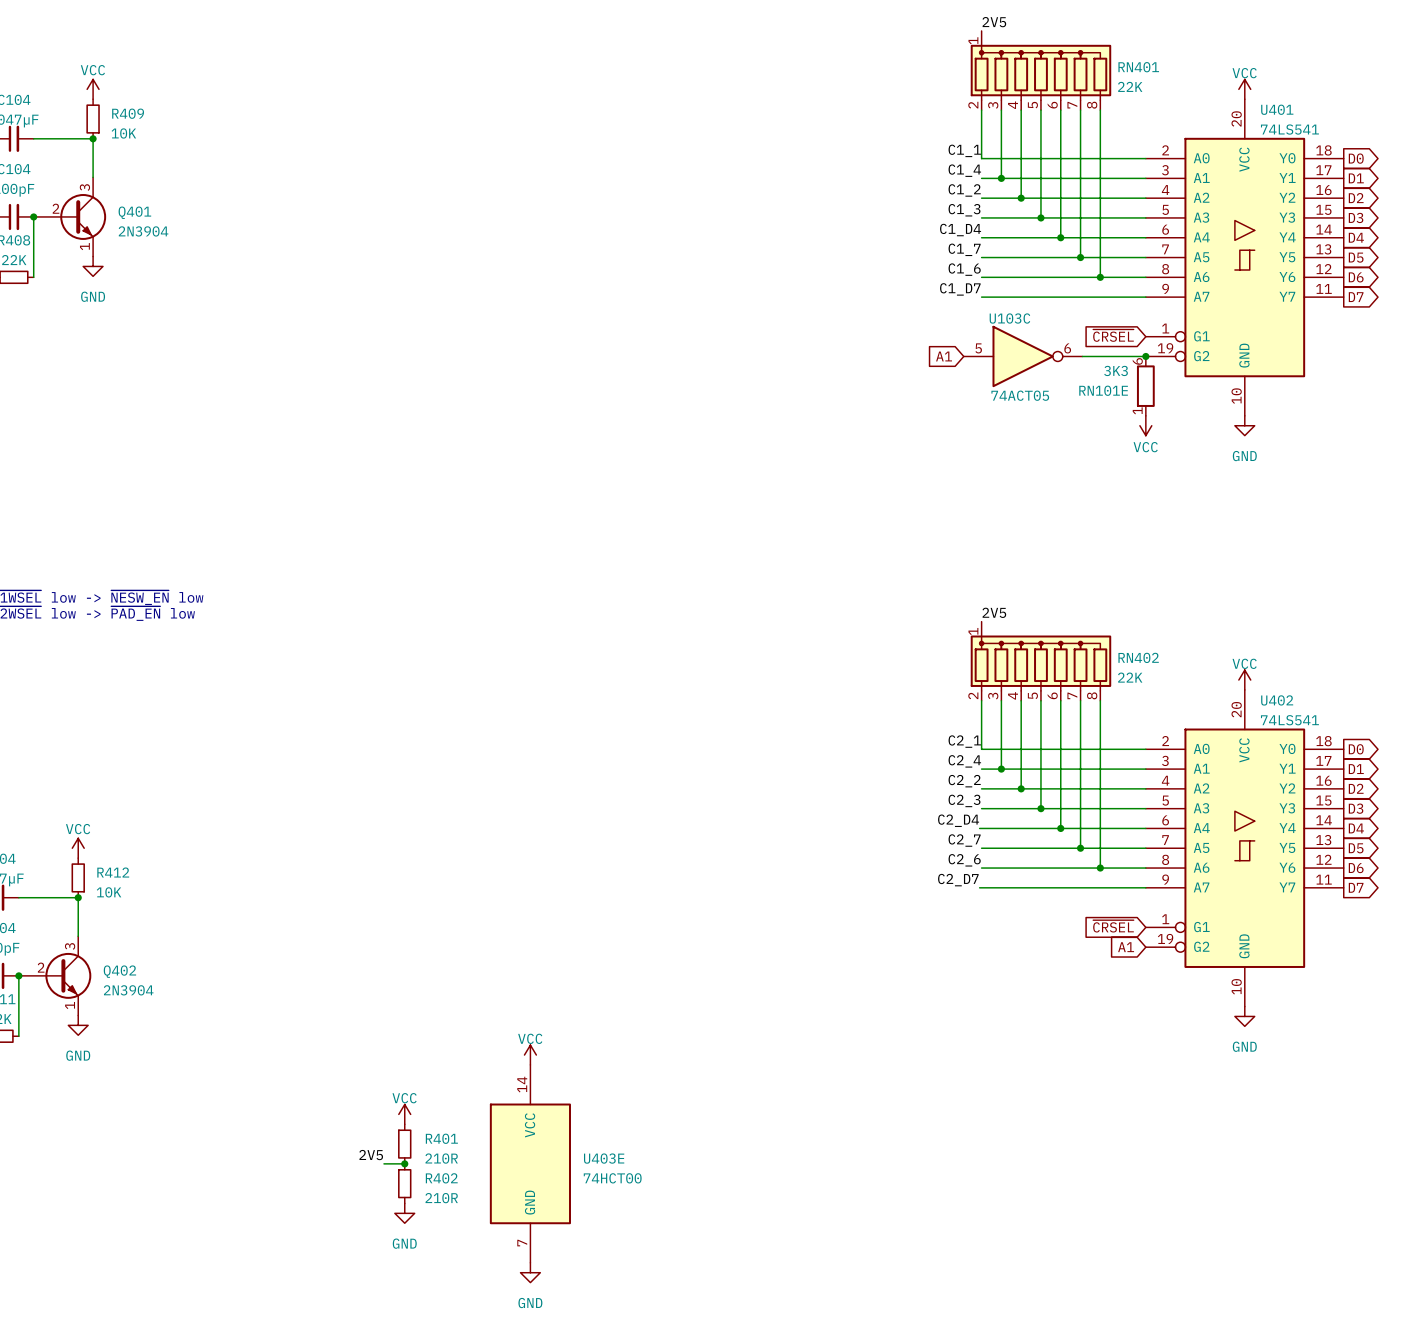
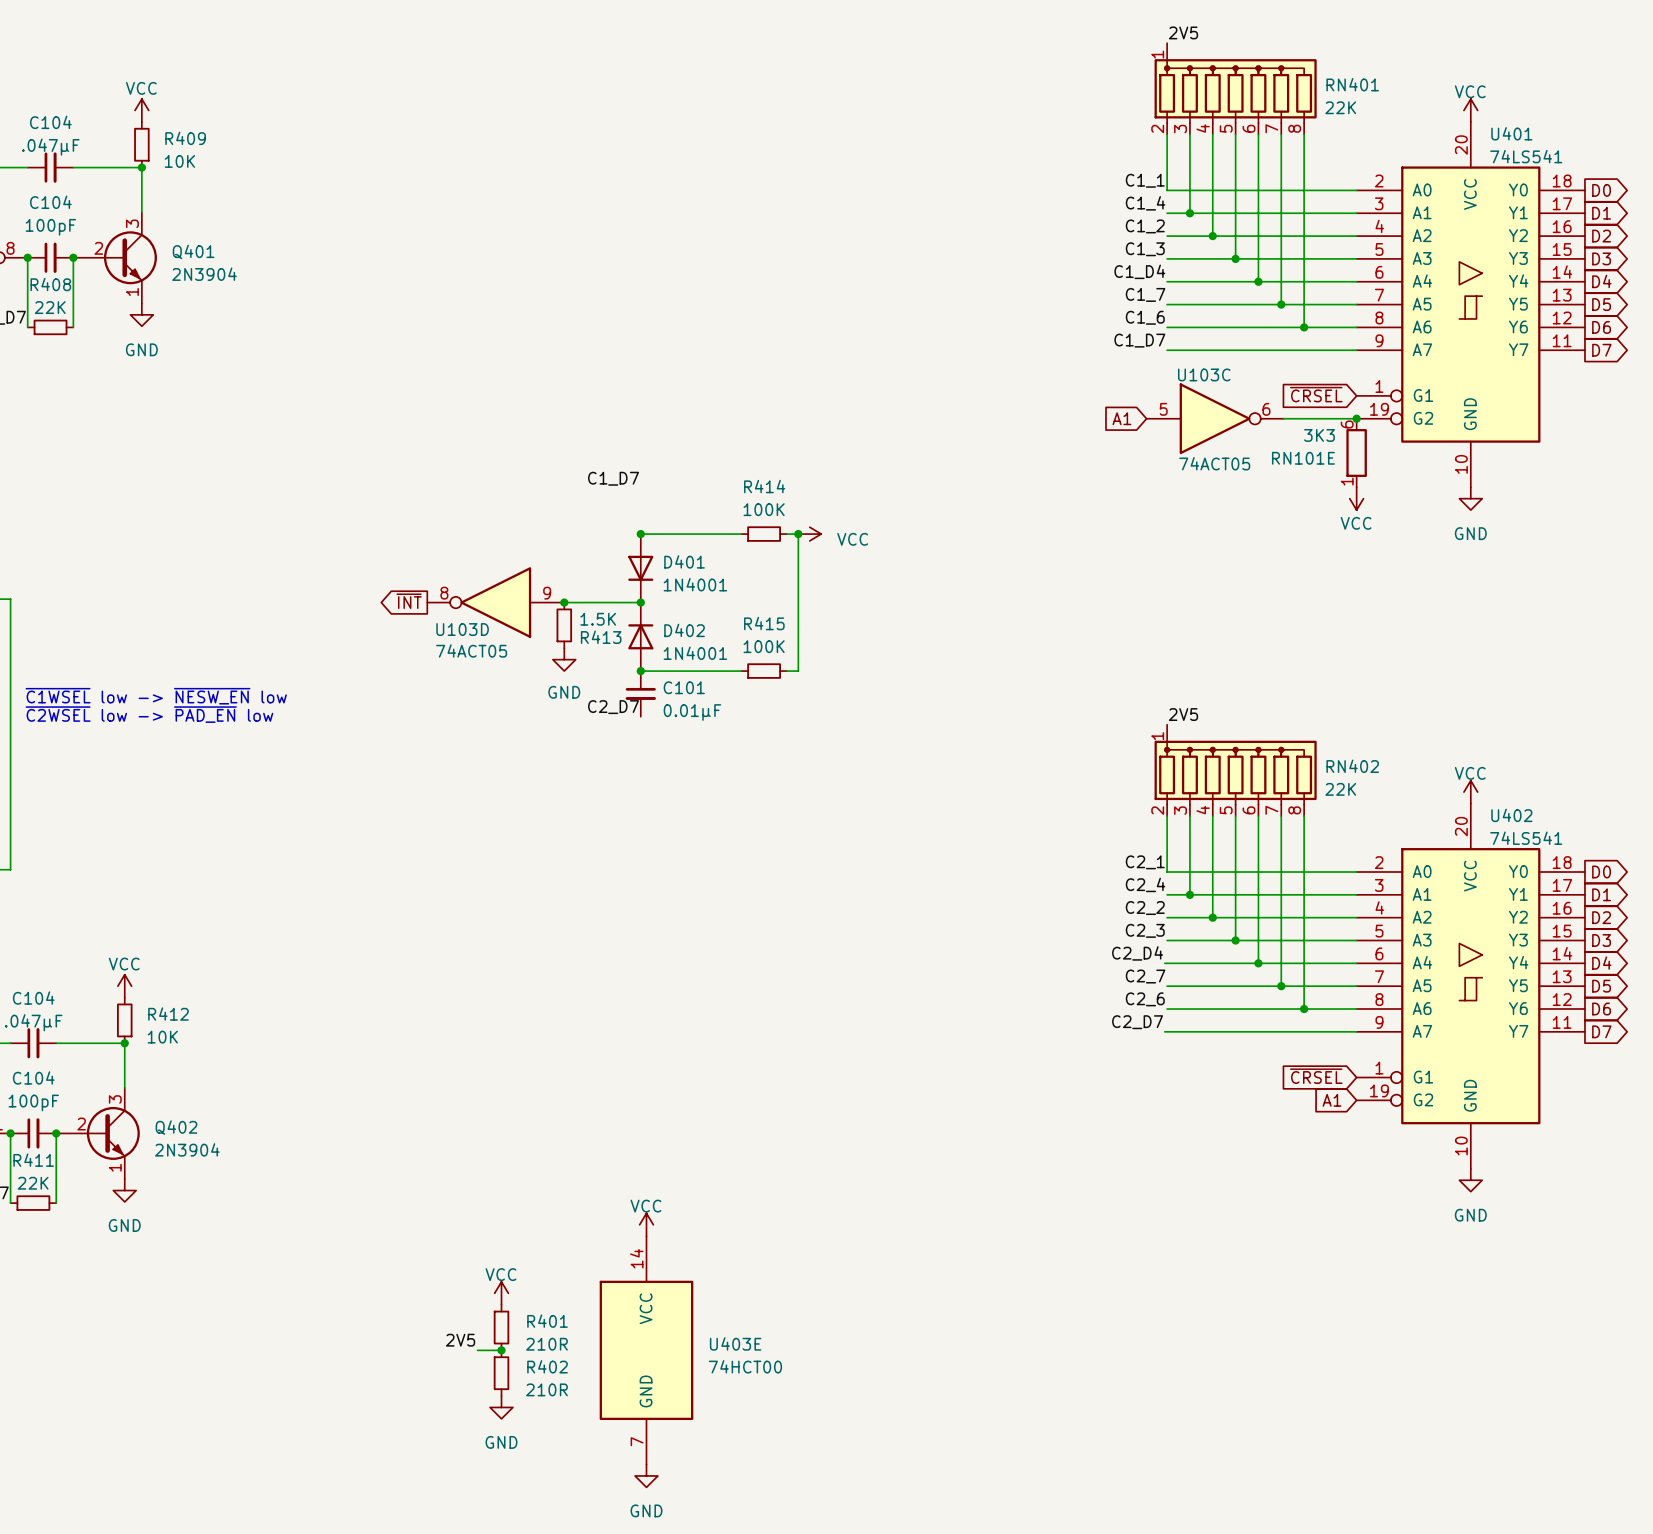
label: none -> C1_D7 (613, 478)
wire: none -> (640, 534) (741, 534)
junction: none -> (640, 534)
R414: none -> 100K (764, 534)
wire: none -> (786, 534) (798, 534) (798, 671) (786, 671)
junction: none -> (798, 534)
power symbol: none -> VCC (809, 534)
D401: none -> 1N4001 (640, 568)
global label: none -> ~{INT} (409, 601)
U103D: none -> 74ACT05 (495, 602)
wire: none -> (564, 602) (640, 602)
junction: none -> (564, 602)
junction: none -> (640, 602)
R413: none -> 1.5K (564, 625)
D402: none -> 1N4001 (640, 636)
power symbol: none -> GND (564, 659)
wire: none -> (640, 671) (741, 671)
junction: none -> (640, 671)
R415: none -> 100K (764, 671)
C101: none -> 0.01µF (640, 693)
label: none -> C2_D7 (613, 707)

